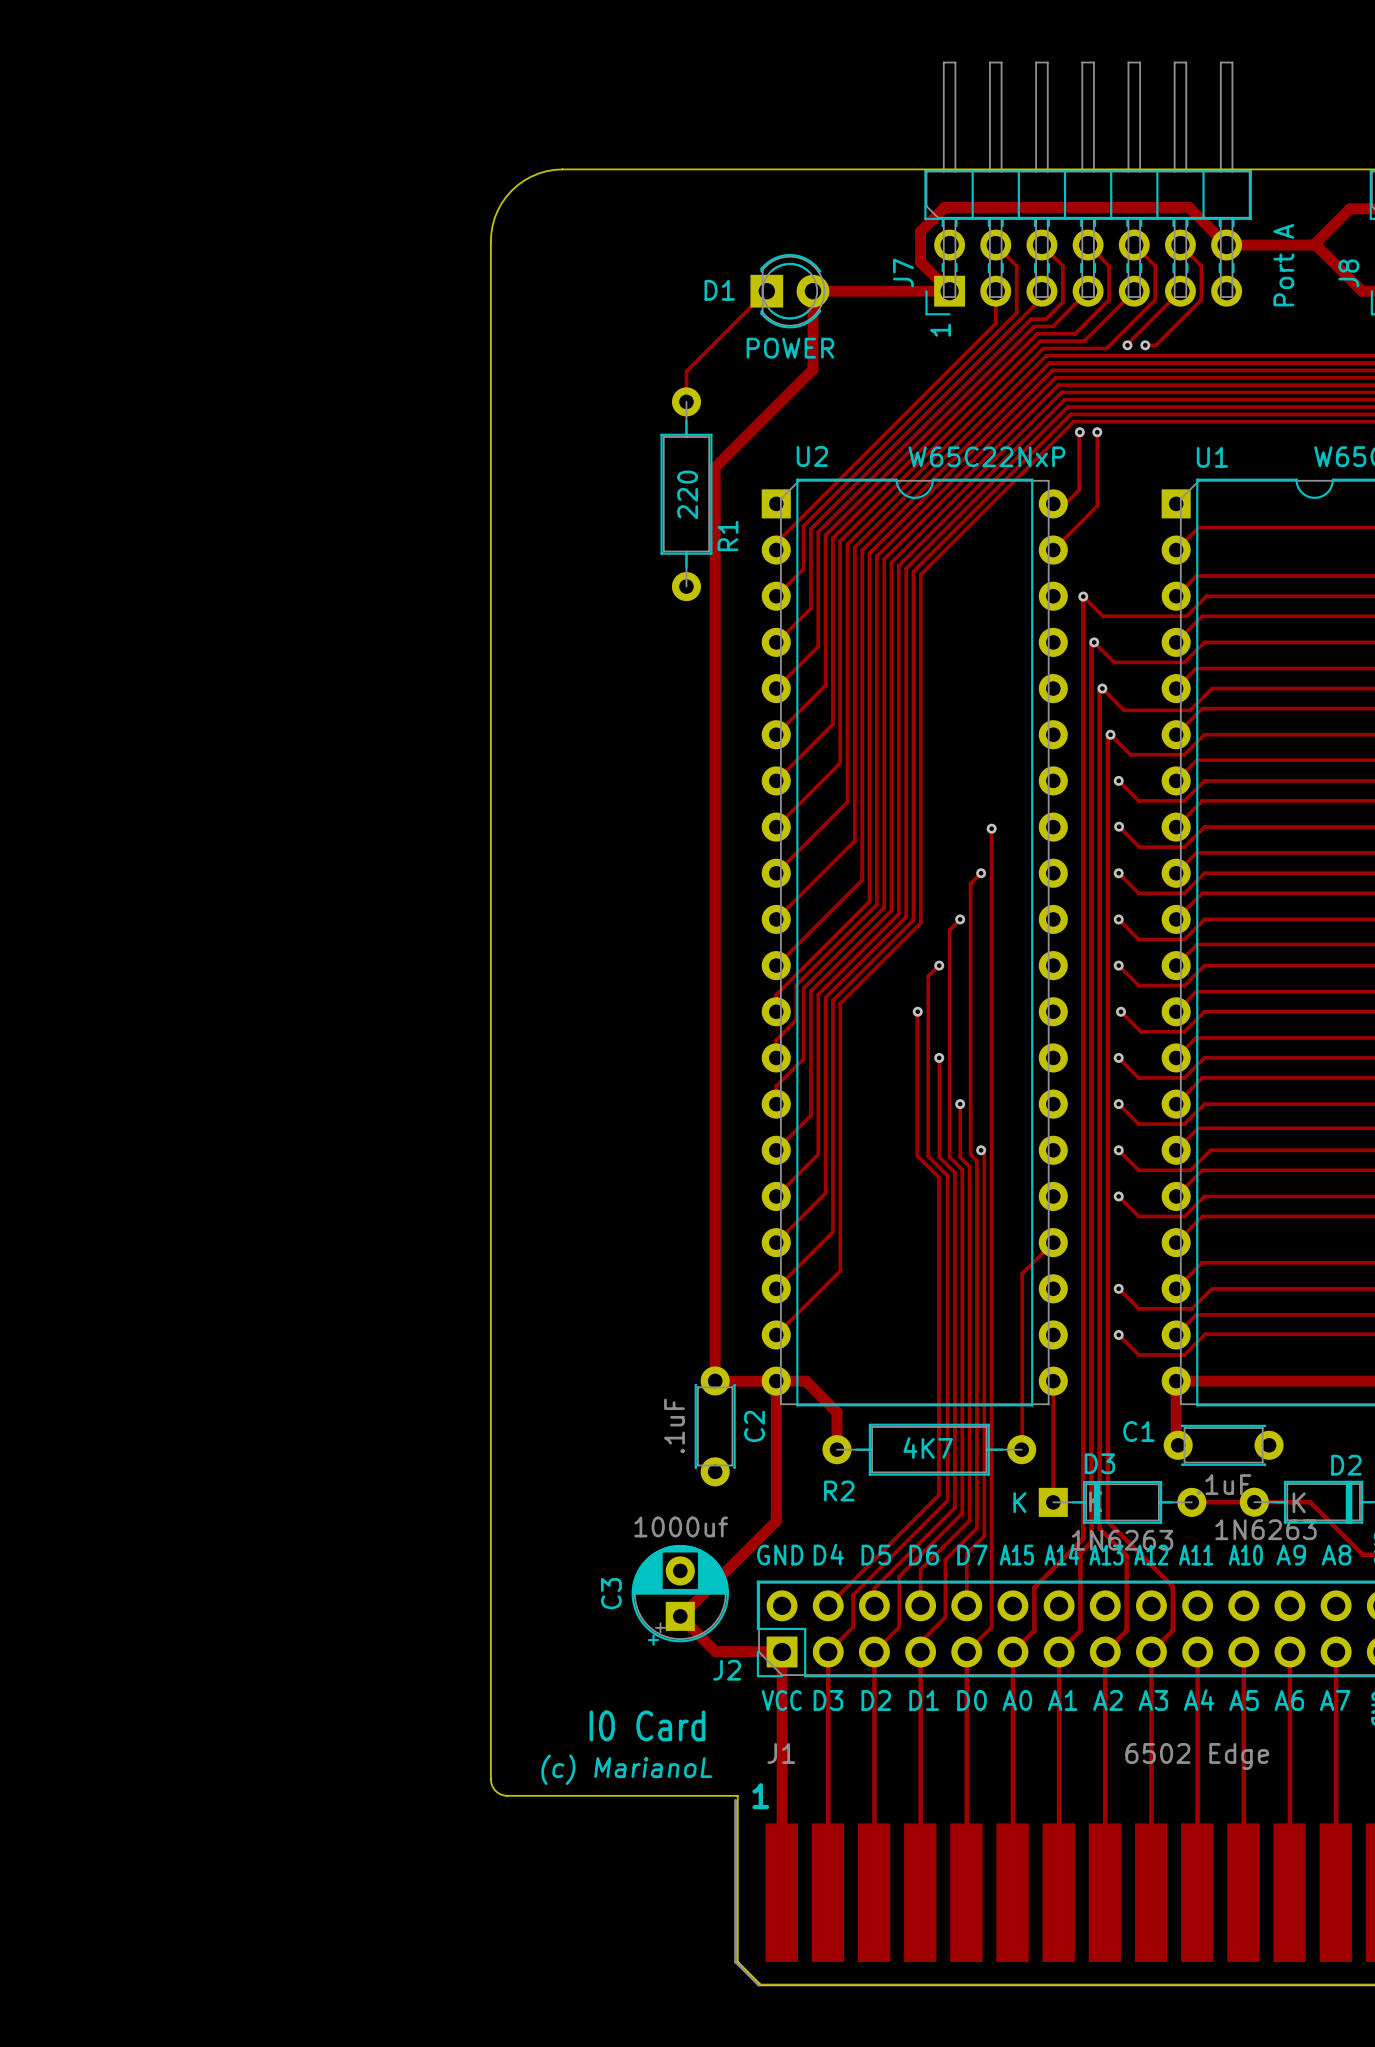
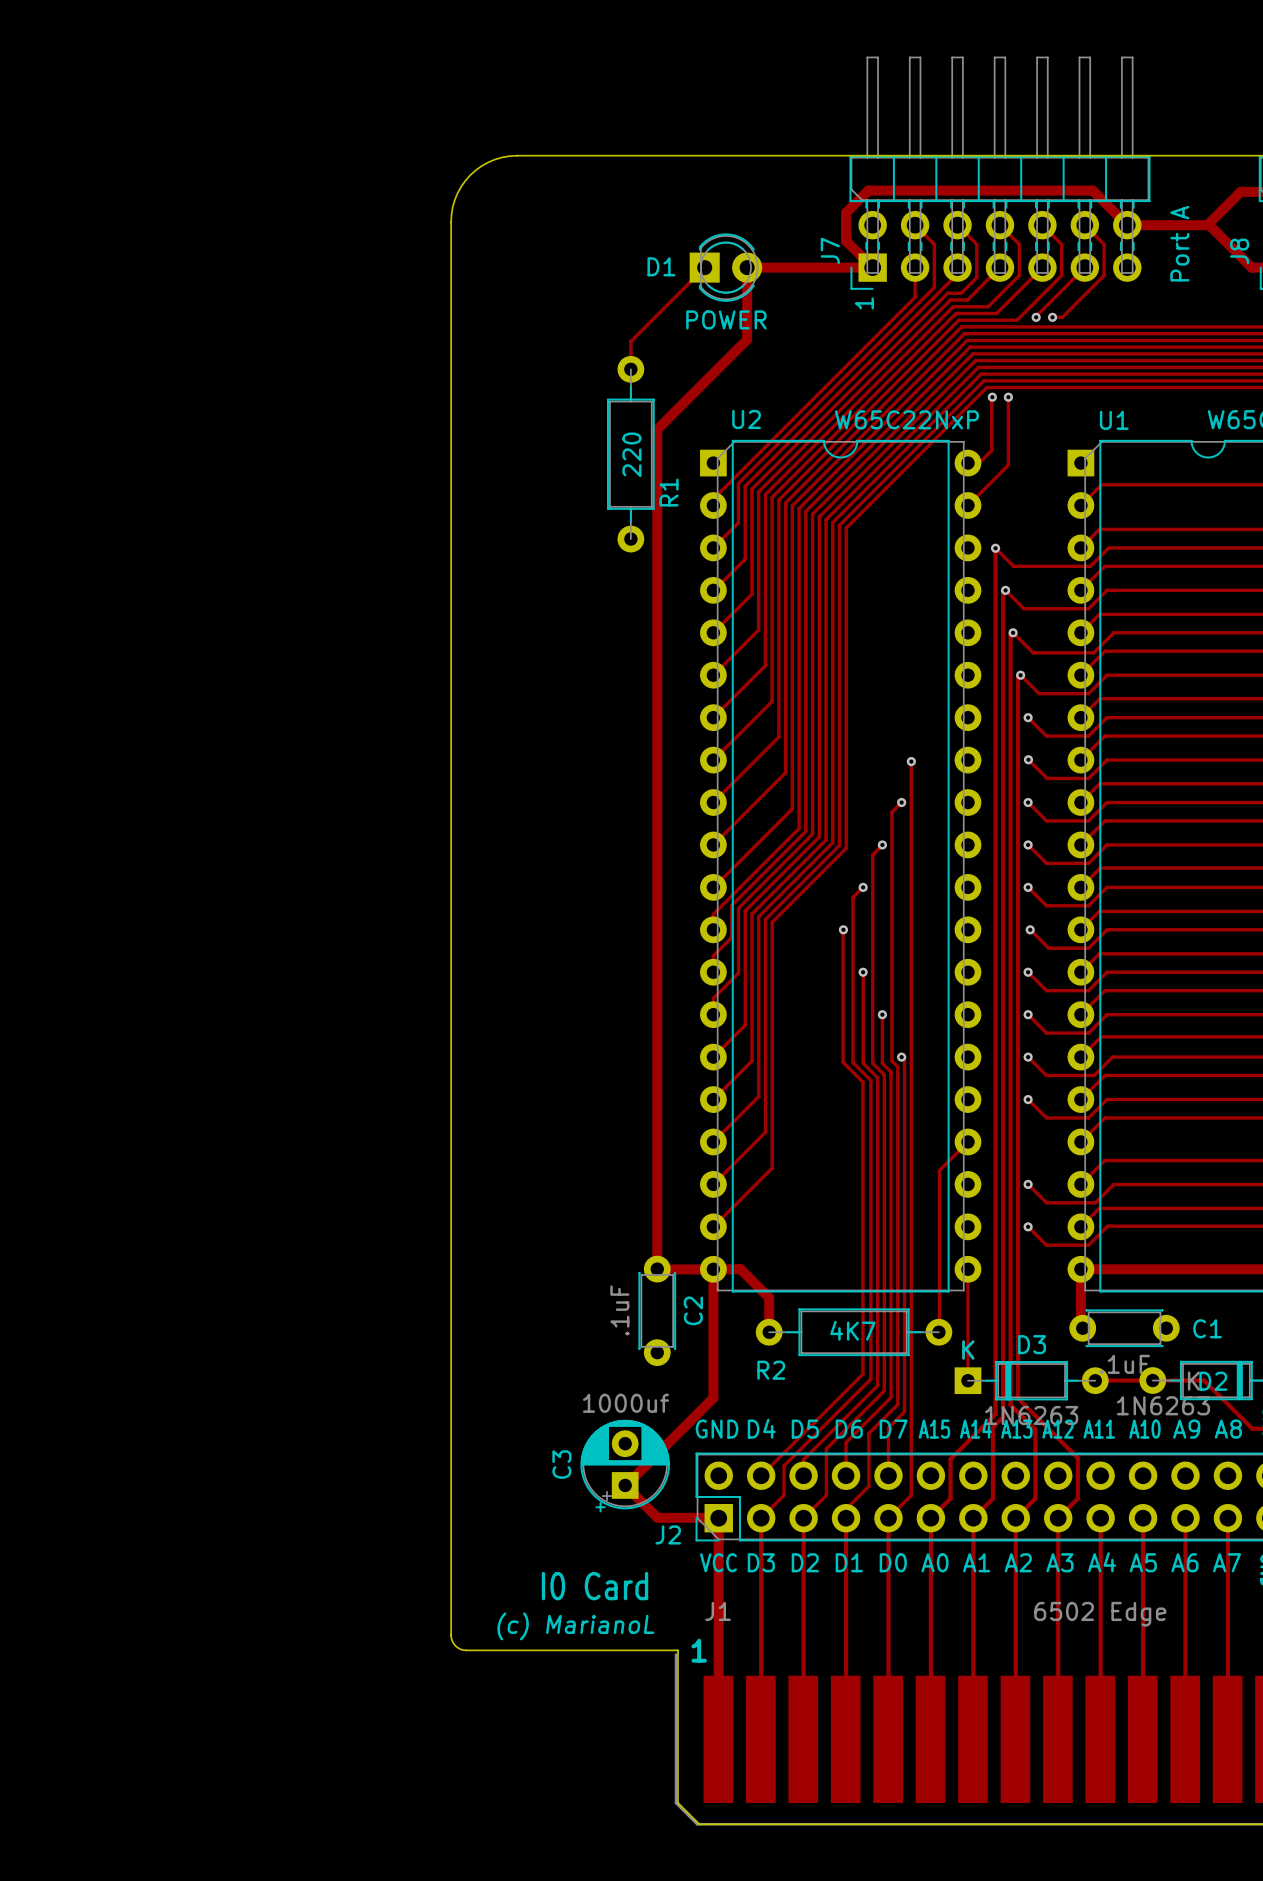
C1 name position: C1 (1138, 1431) -> C1 (1207, 1328)
D2 name position: D2 (1346, 1465) -> D2 (1213, 1381)
D3 footprint: [1038, 1480, 1207, 1524] -> [954, 1360, 1109, 1401]

